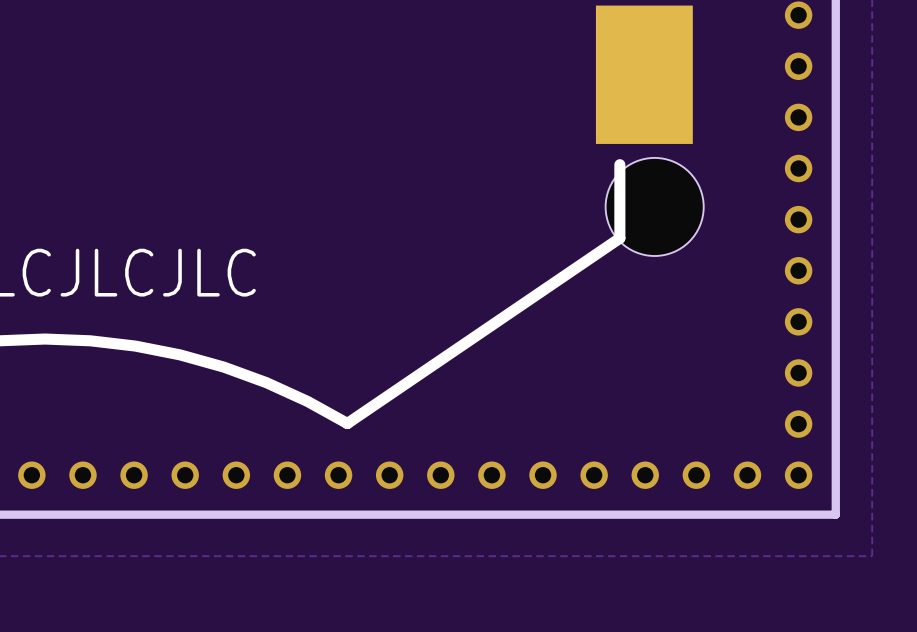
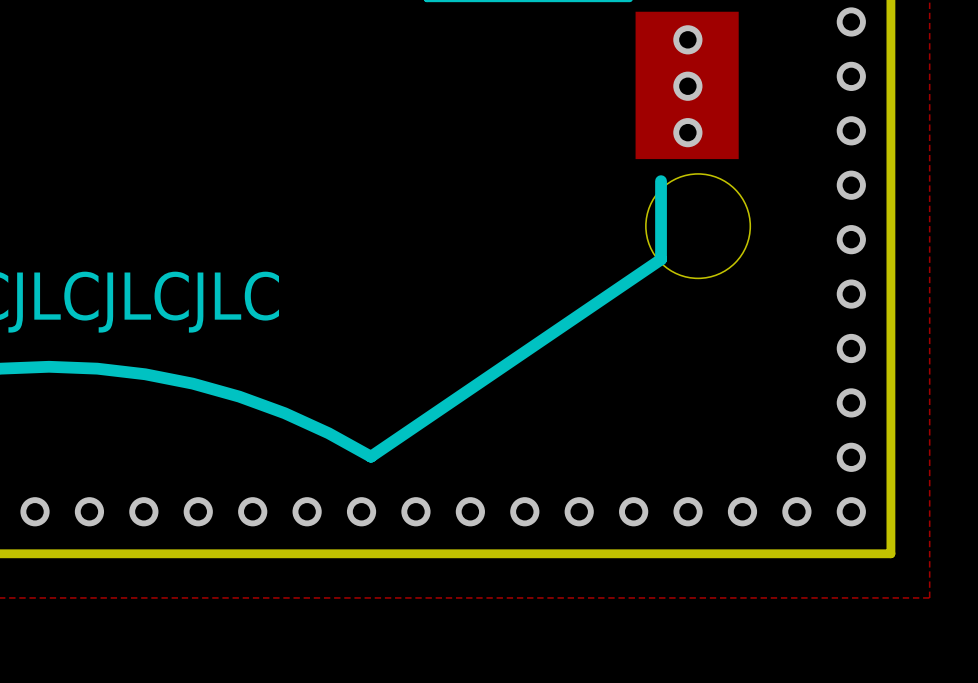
via: none -> (687, 39)
via: none -> (687, 86)
via: none -> (687, 132)

